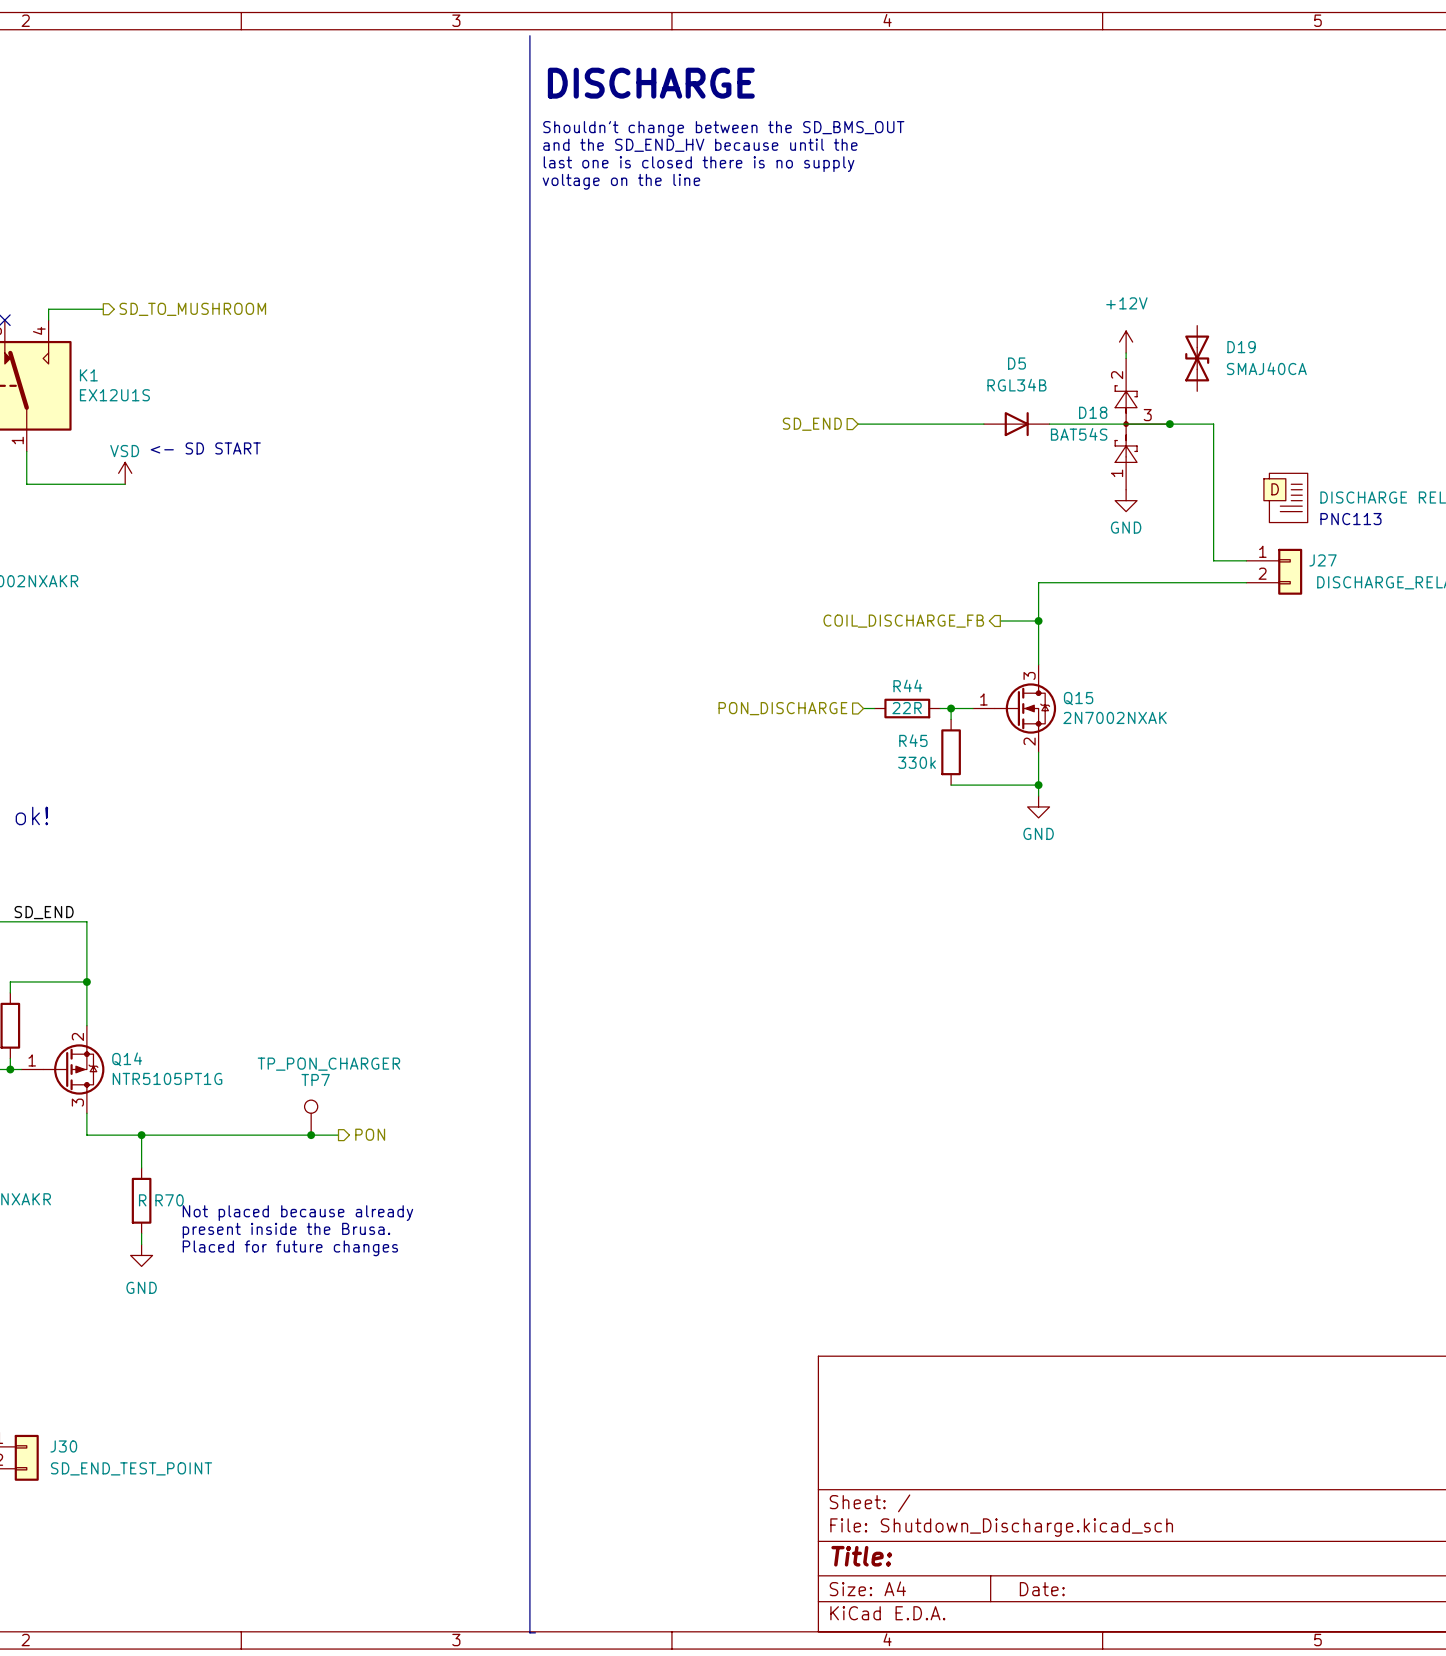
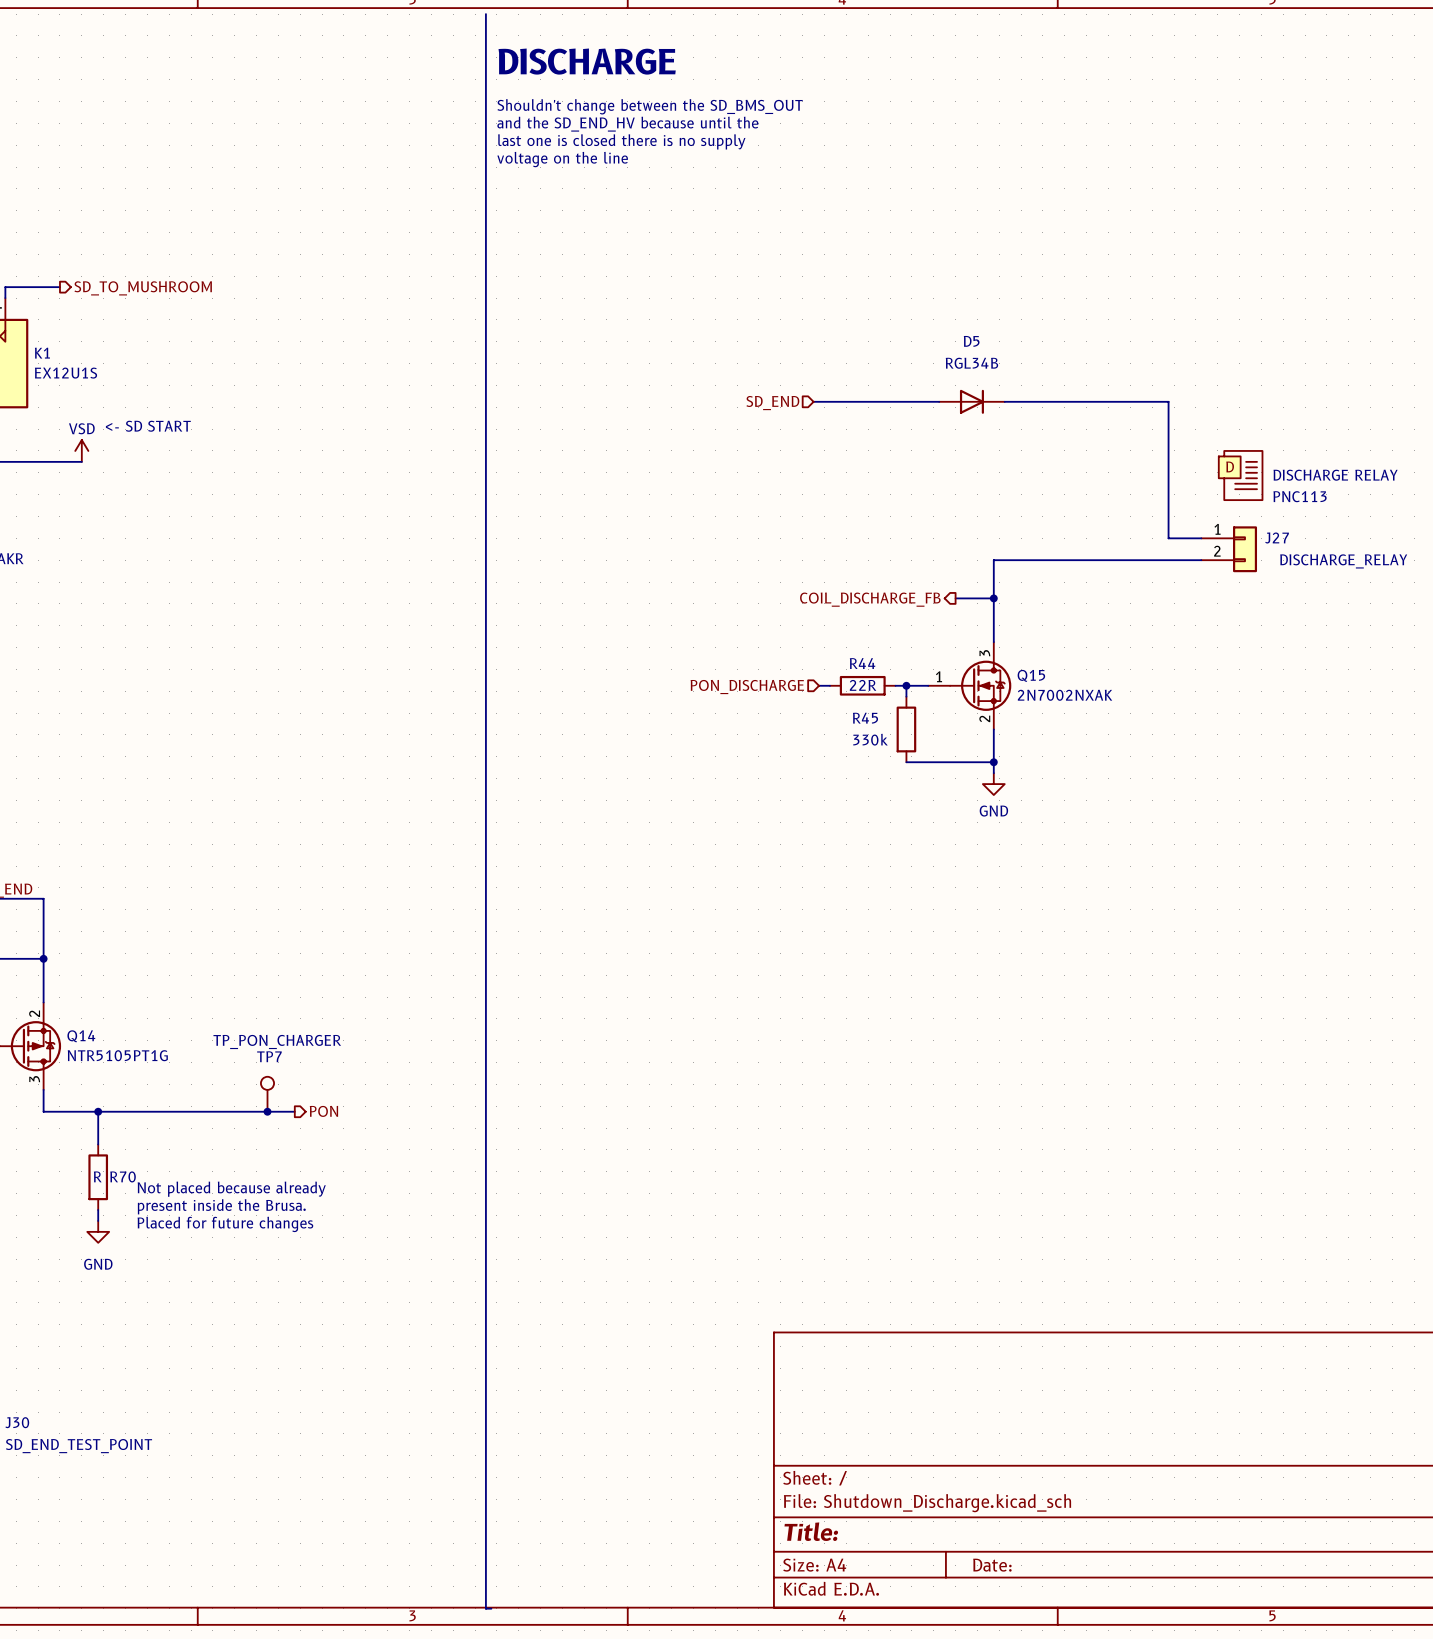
power symbol: +12V (1126, 342) -> none
wire: (1126, 353) (1126, 358) -> none
D19: SMAJ40CA (1197, 358) -> none
D18: BAT54S (1142, 424) -> none
junction: (1169, 424) -> none
power symbol: GND (1126, 500) -> none

